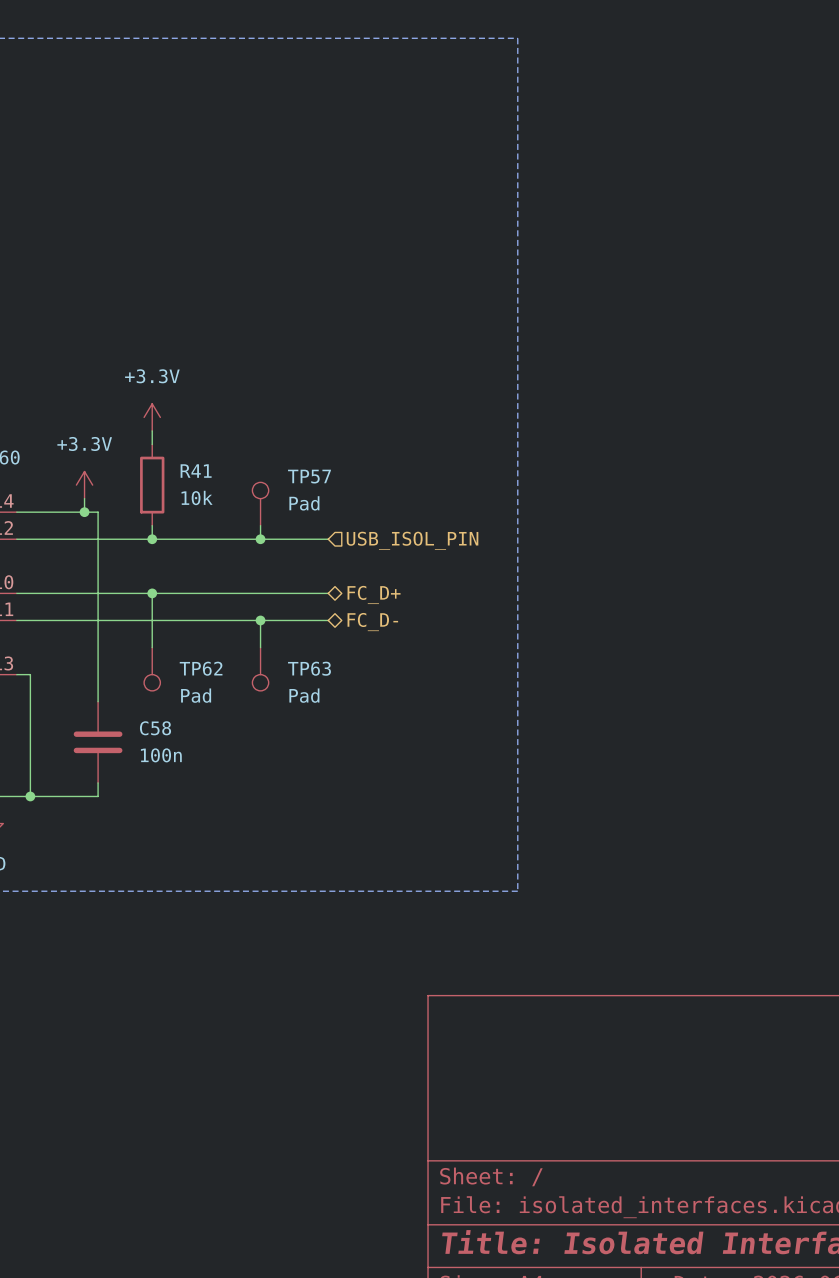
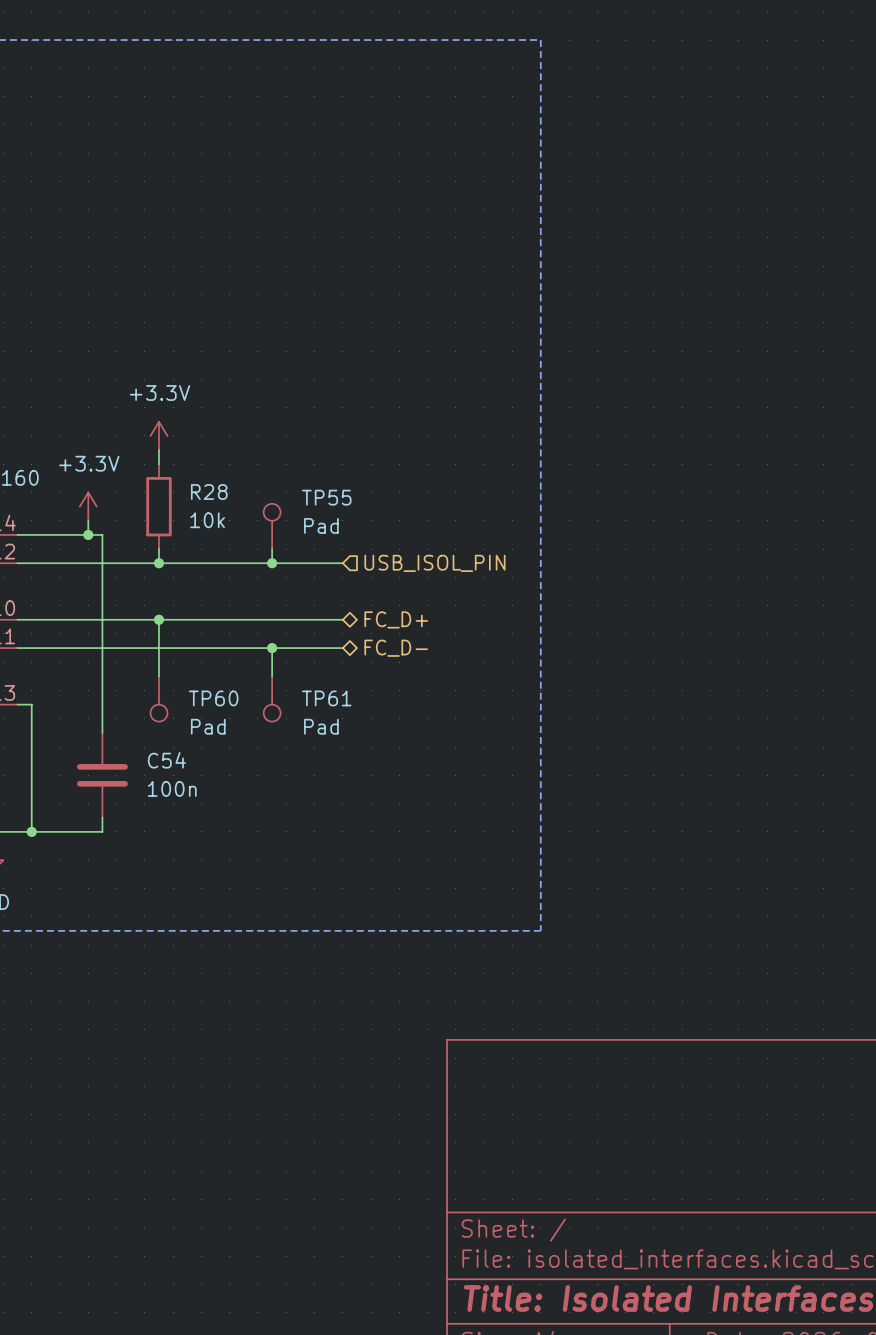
R41 name: R41 (196, 471) -> R28 (209, 491)
TP57 name: TP57 (309, 476) -> TP55 (326, 497)
TP62 name: TP62 (201, 668) -> TP60 (213, 698)
TP63 name: TP63 (309, 668) -> TP61 (326, 698)
C58 name: C58 (155, 728) -> C54 (166, 760)

